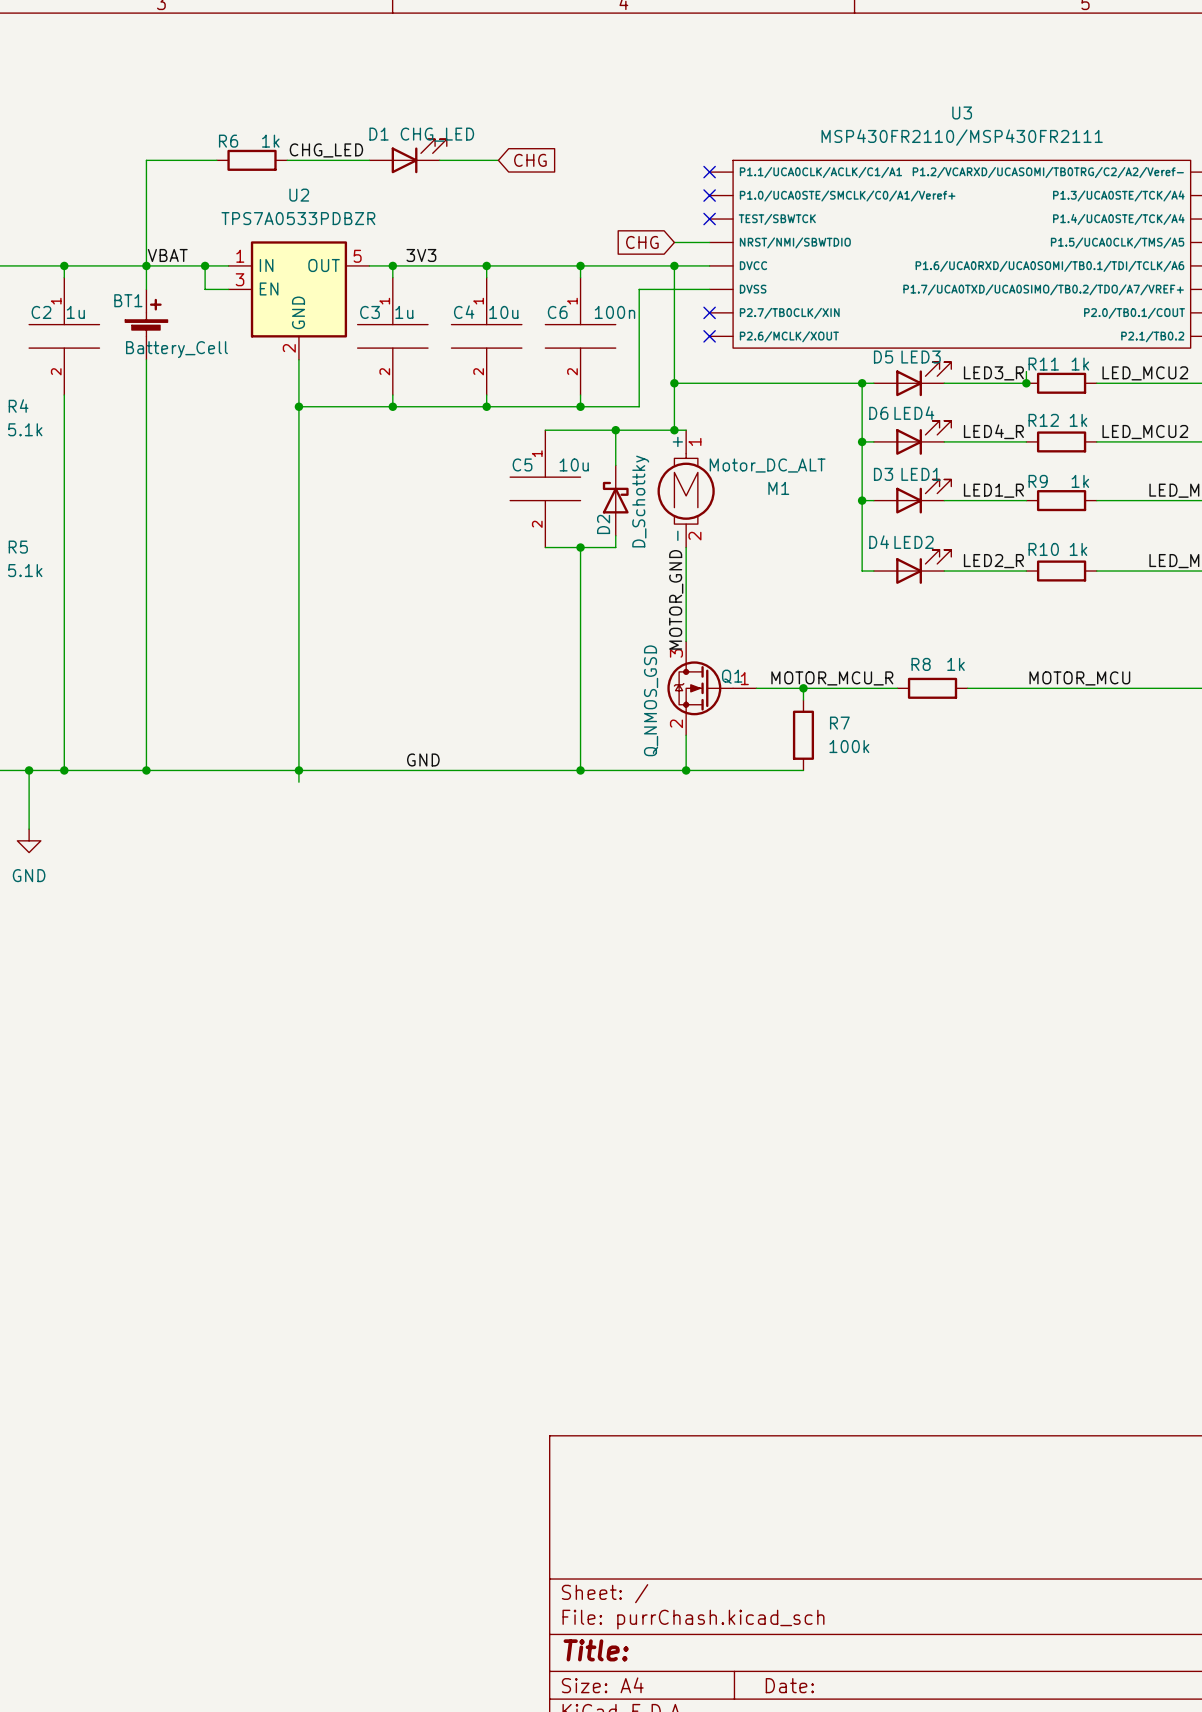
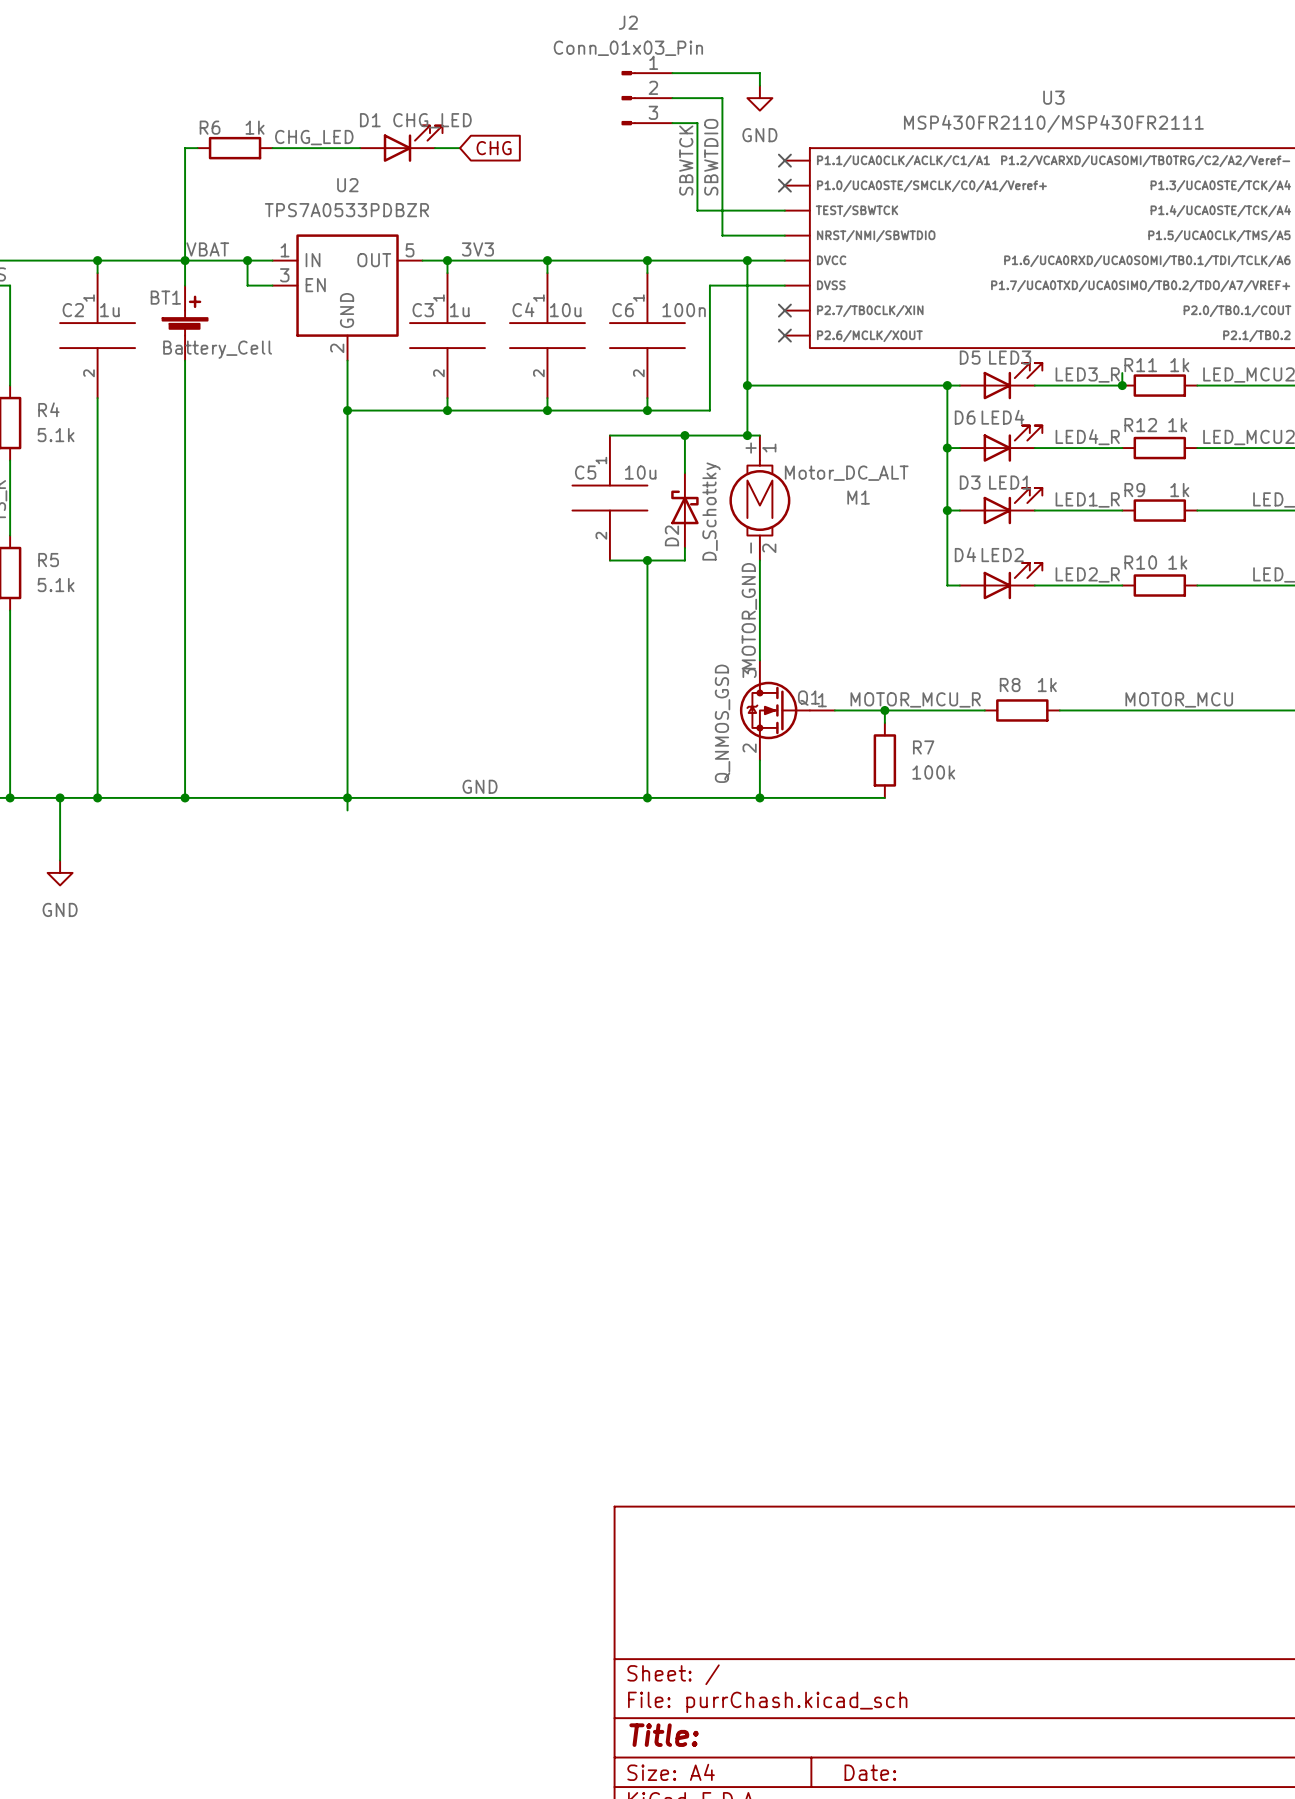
wire: none -> (672, 73) (759, 73) (759, 85)
J2: none -> Conn_01x03_Pin (647, 98)
wire: none -> (672, 98) (722, 98) (722, 235) (747, 235)
power symbol: none -> GND (759, 98)
wire: none -> (672, 123) (697, 123) (697, 210) (784, 210)
label position: CHG_LED (326, 150) -> CHG_LED (314, 137)
D1 position: (408, 156) -> (401, 143)
wire: (158, 160) (216, 160) -> (272, 148) (335, 148)
R6 position: (252, 160) -> (235, 148)
wire: (439, 160) (498, 160) -> none
global label position: CHG (530, 160) -> CHG (494, 148)
label: none -> SBWTDIO (711, 157)
label: none -> SBWTCK (686, 160)
no-connect mark: (709, 219) -> none
global label: CHG (642, 242) -> none

